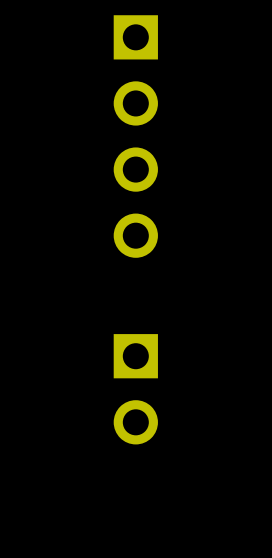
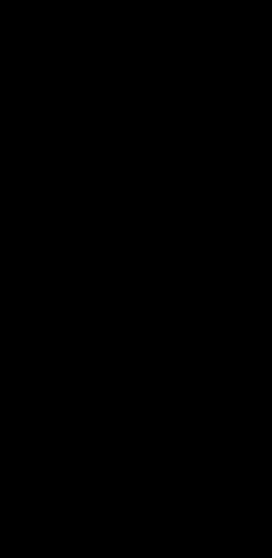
part: (135, 136) -> none
part: (135, 389) -> none

